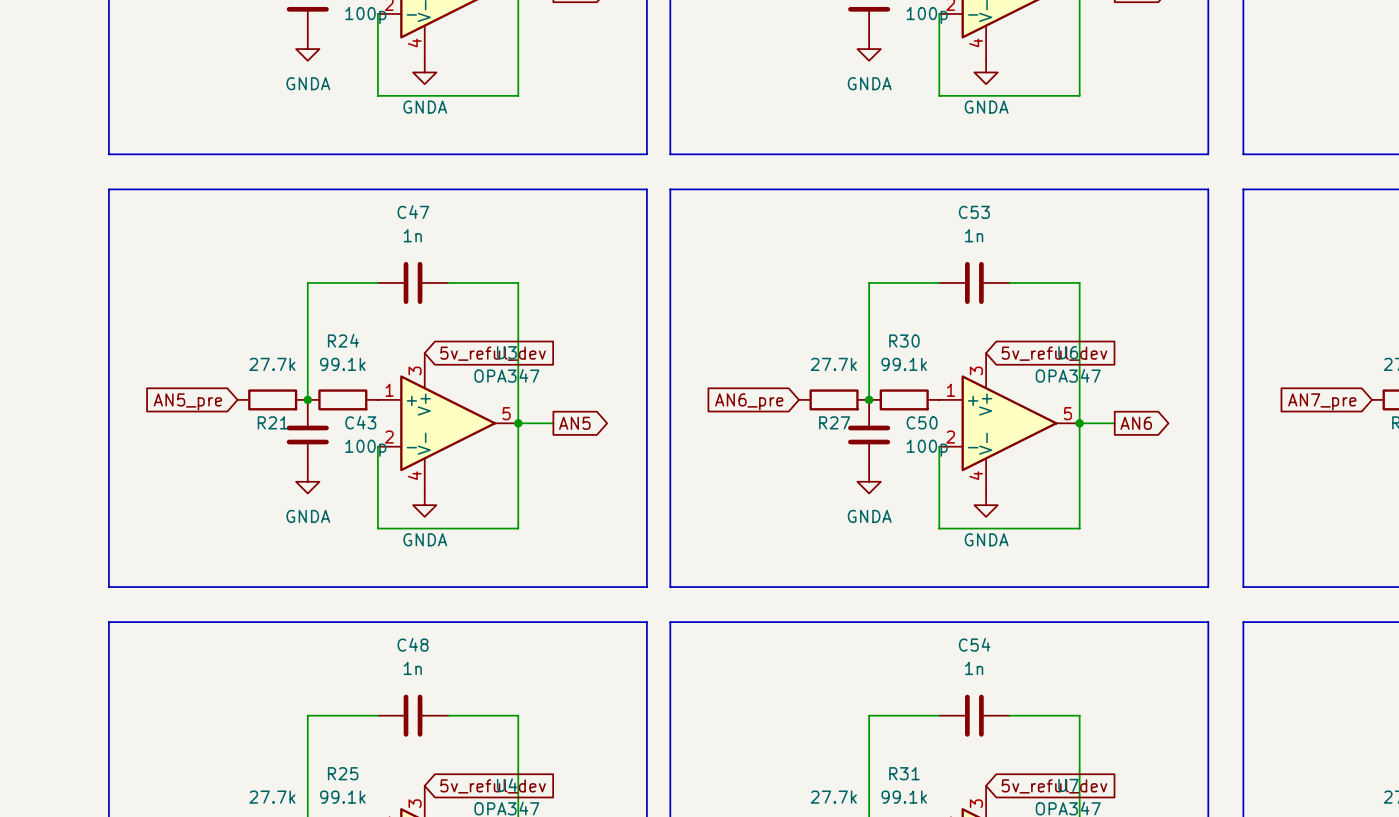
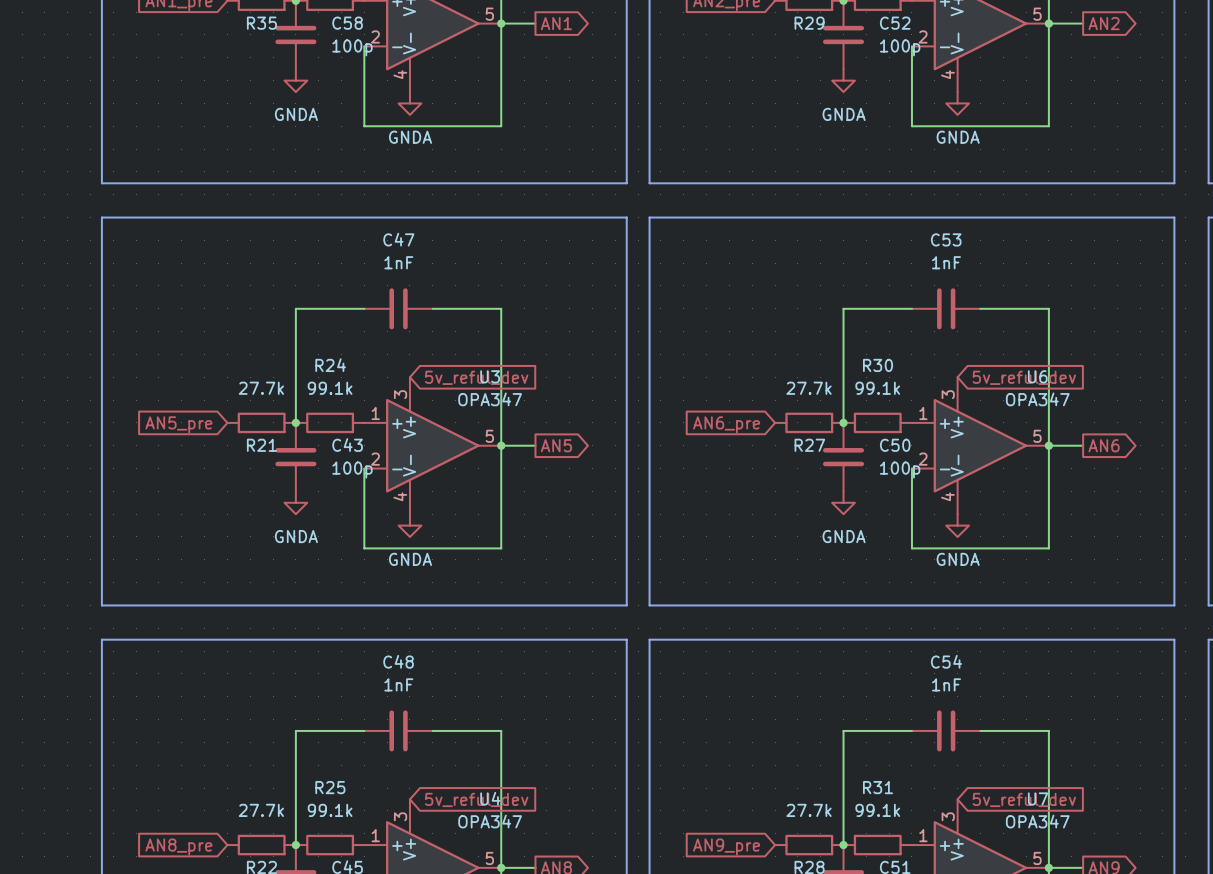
C47 value: 1n (412, 235) -> 1nF (398, 262)
C53 value: 1n (974, 235) -> 1nF (946, 262)
C48 value: 1n (412, 668) -> 1nF (398, 684)
C54 value: 1n (974, 668) -> 1nF (946, 684)

